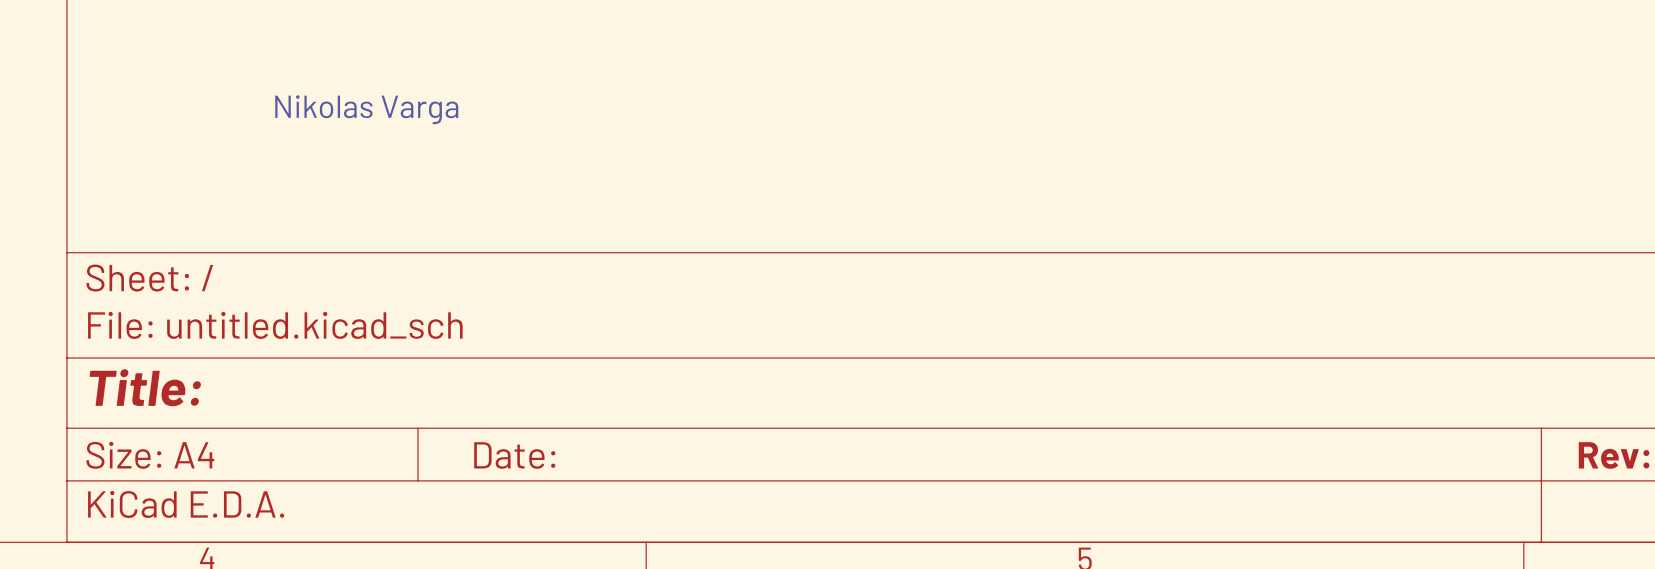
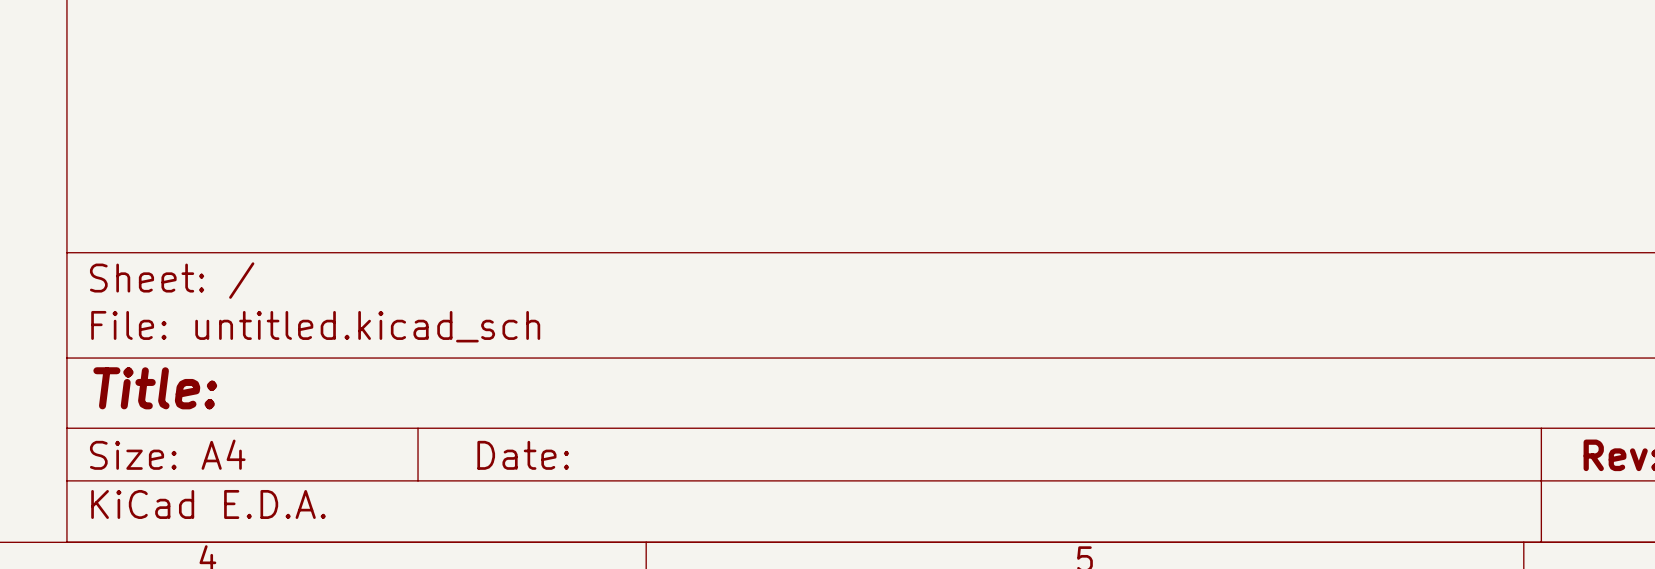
text: Nikolas Varga (366, 109) -> none

